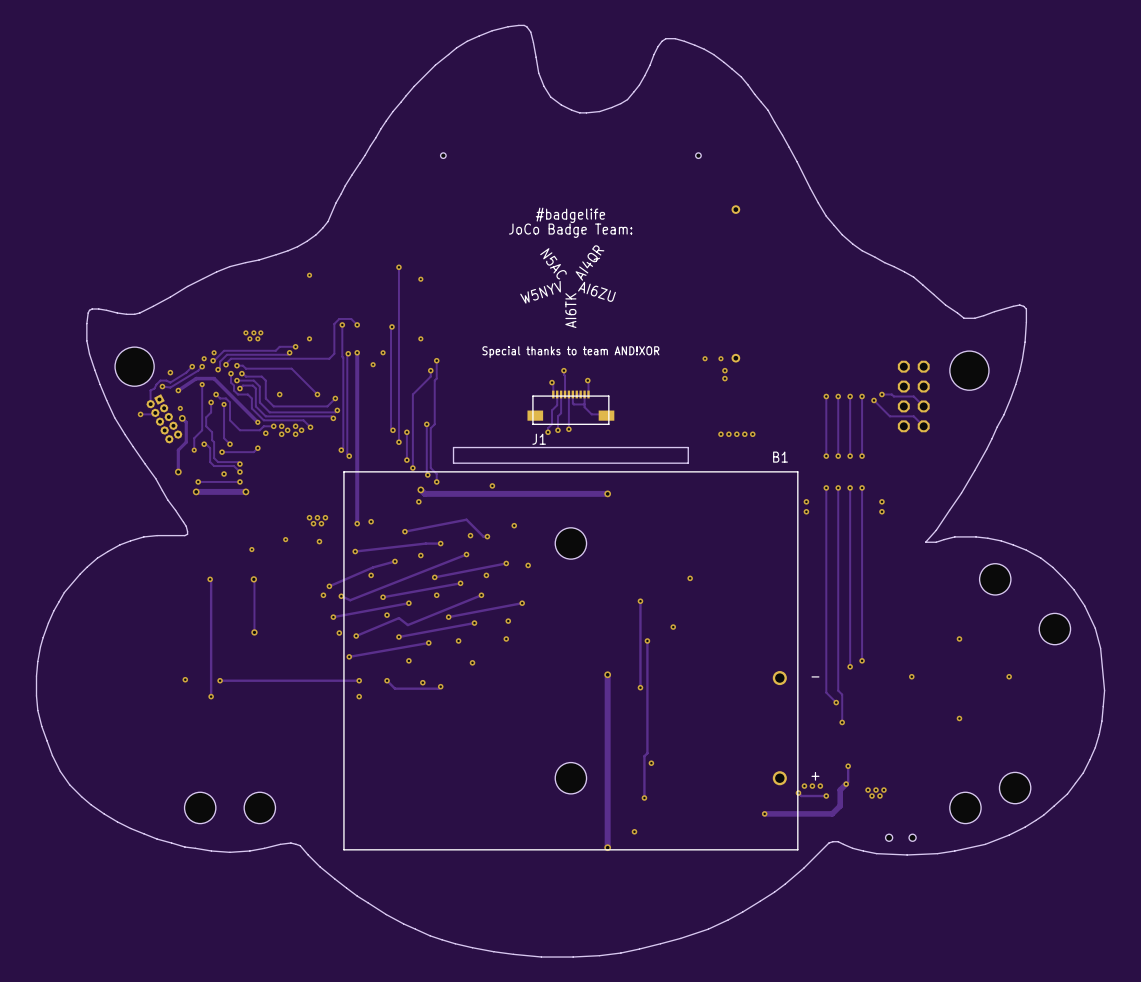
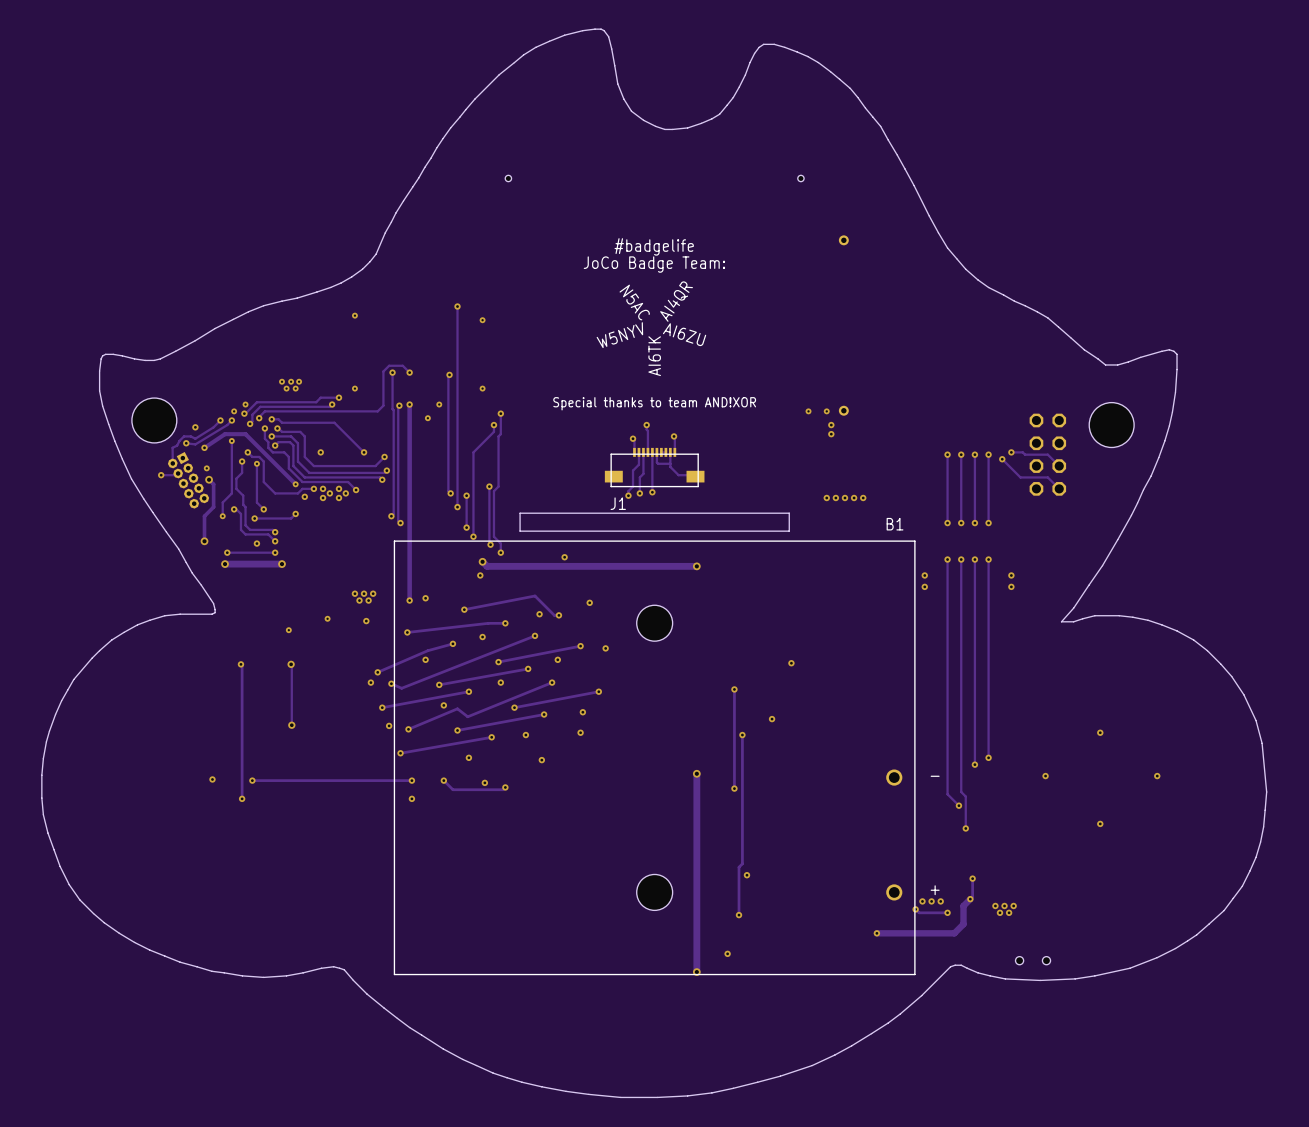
hole: (995, 579) -> none
hole: (1054, 629) -> none
hole: (1015, 788) -> none
hole: (200, 807) -> none
hole: (259, 807) -> none
hole: (965, 807) -> none

